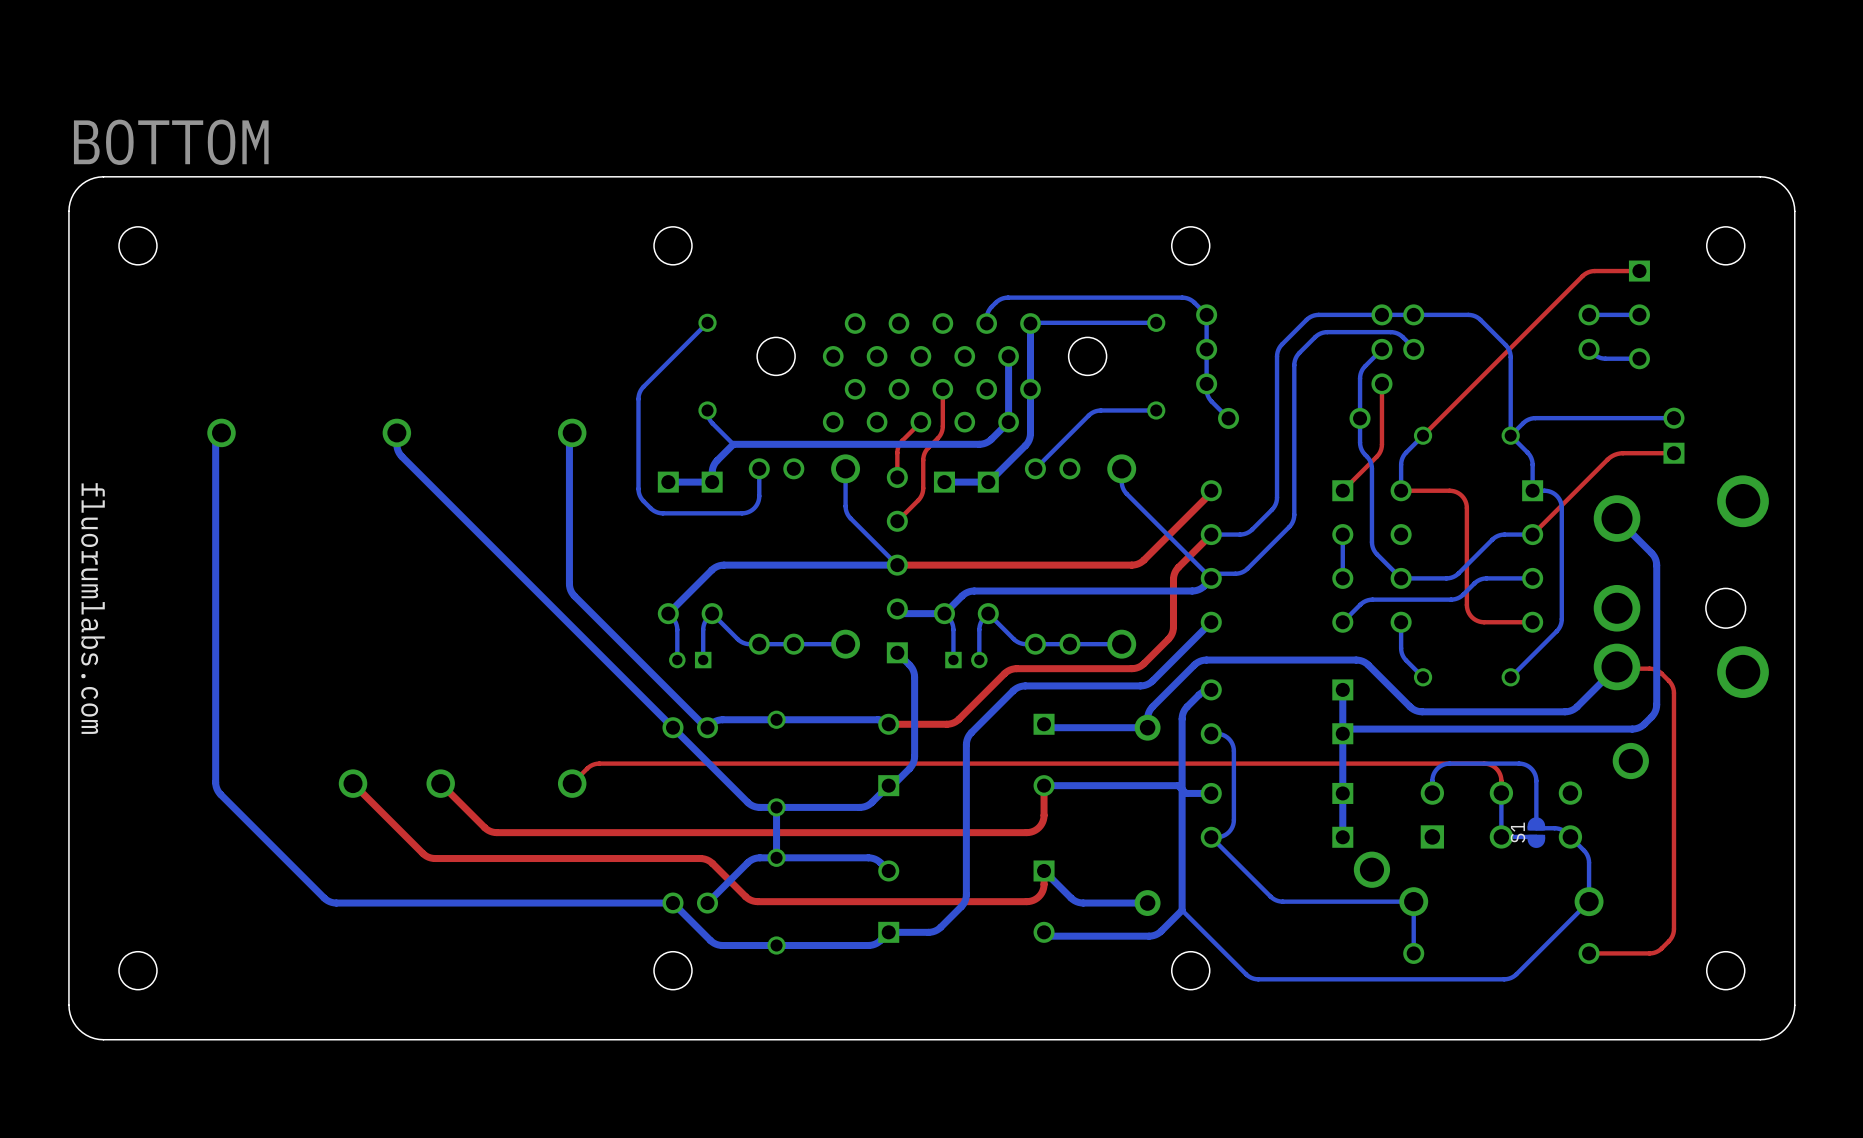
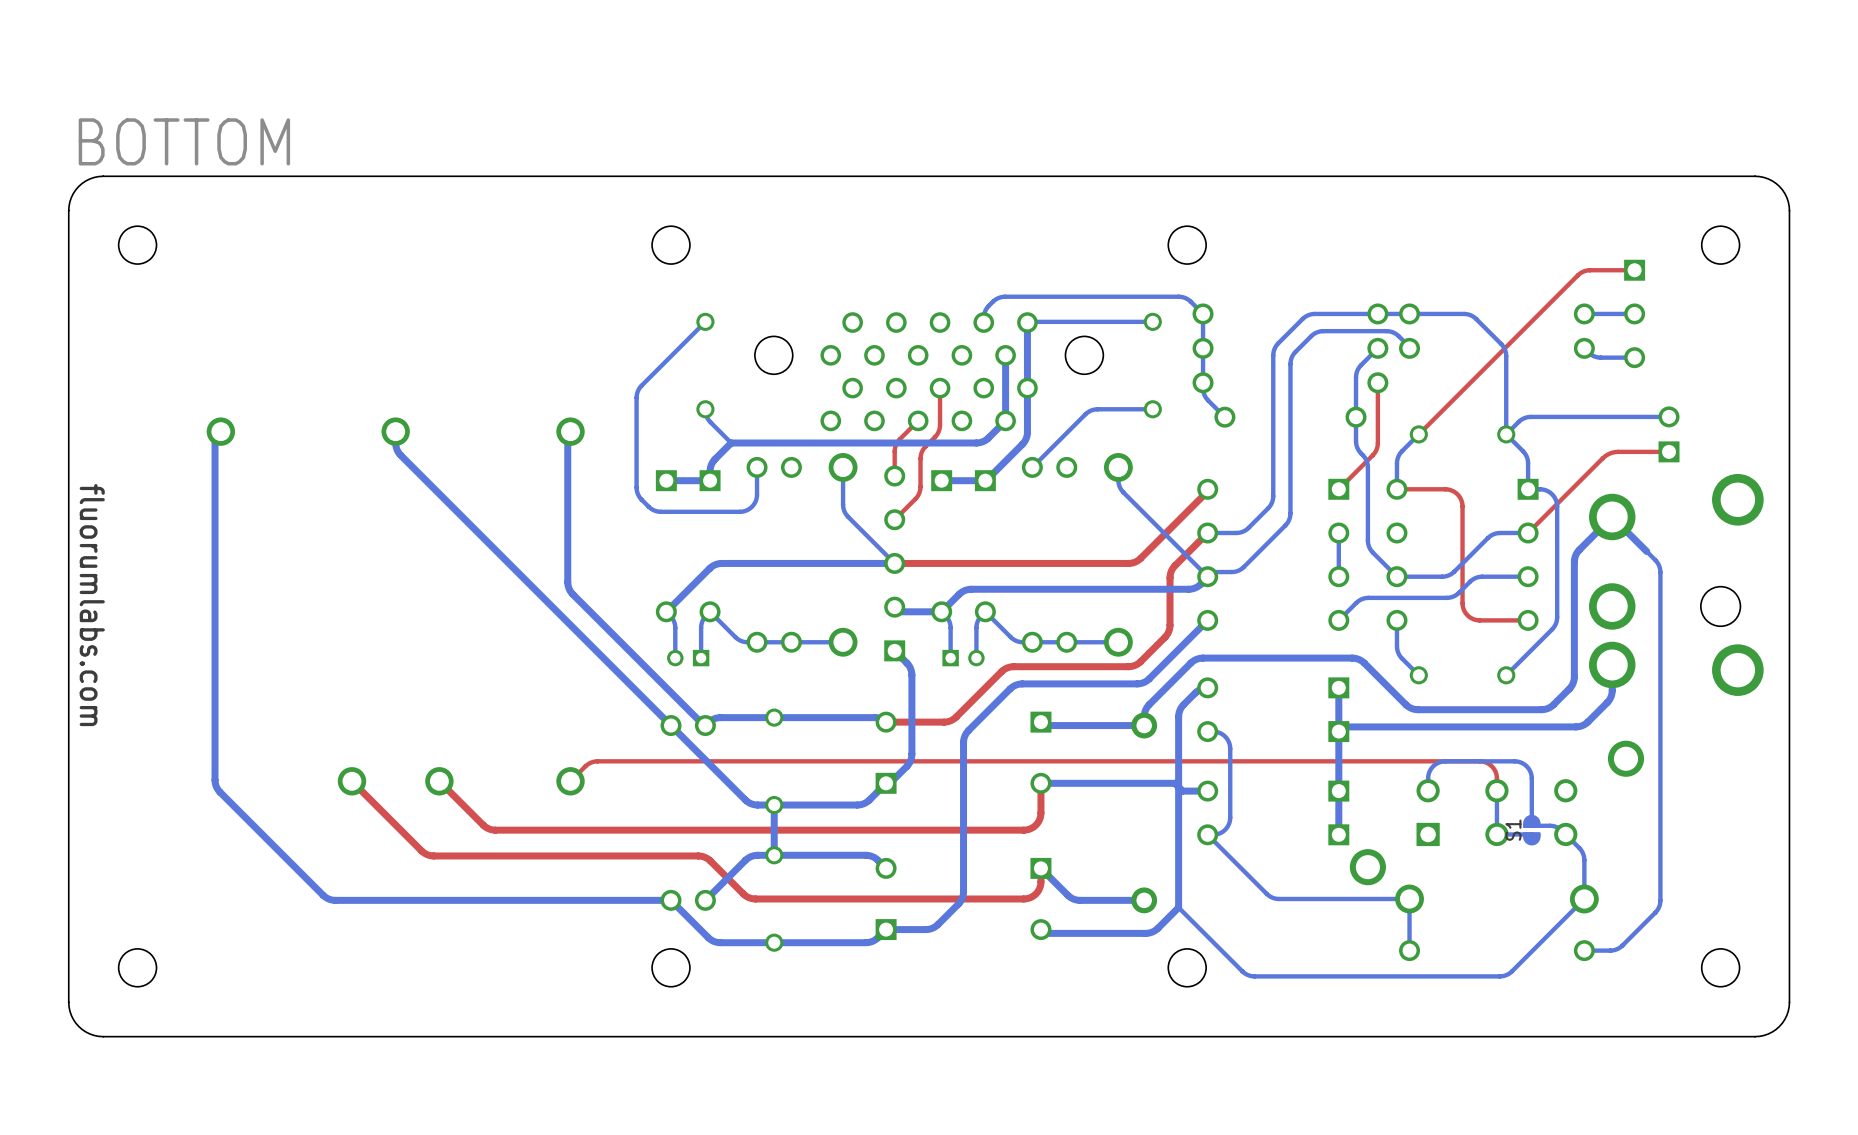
bottom track: none -> (1612, 516) (1575, 555) (1573, 681) (1570, 687) (1553, 704) (1541, 709)
bottom track: (1651, 553) (1656, 565) (1655, 711) (1644, 724) (1636, 728) (1580, 729) -> (1646, 551) (1658, 563) (1660, 572) (1660, 902) (1655, 912) (1618, 948) (1612, 950) (1584, 950)
bottom track: (1617, 666) (1573, 709) (1567, 711) (1546, 711) -> (1612, 664) (1612, 692) (1609, 699) (1586, 723) (1575, 726)
top track: (1617, 666) (1618, 668) (1656, 669) (1668, 680) (1673, 688) (1673, 931) (1668, 941) (1654, 952) (1589, 953) -> none

